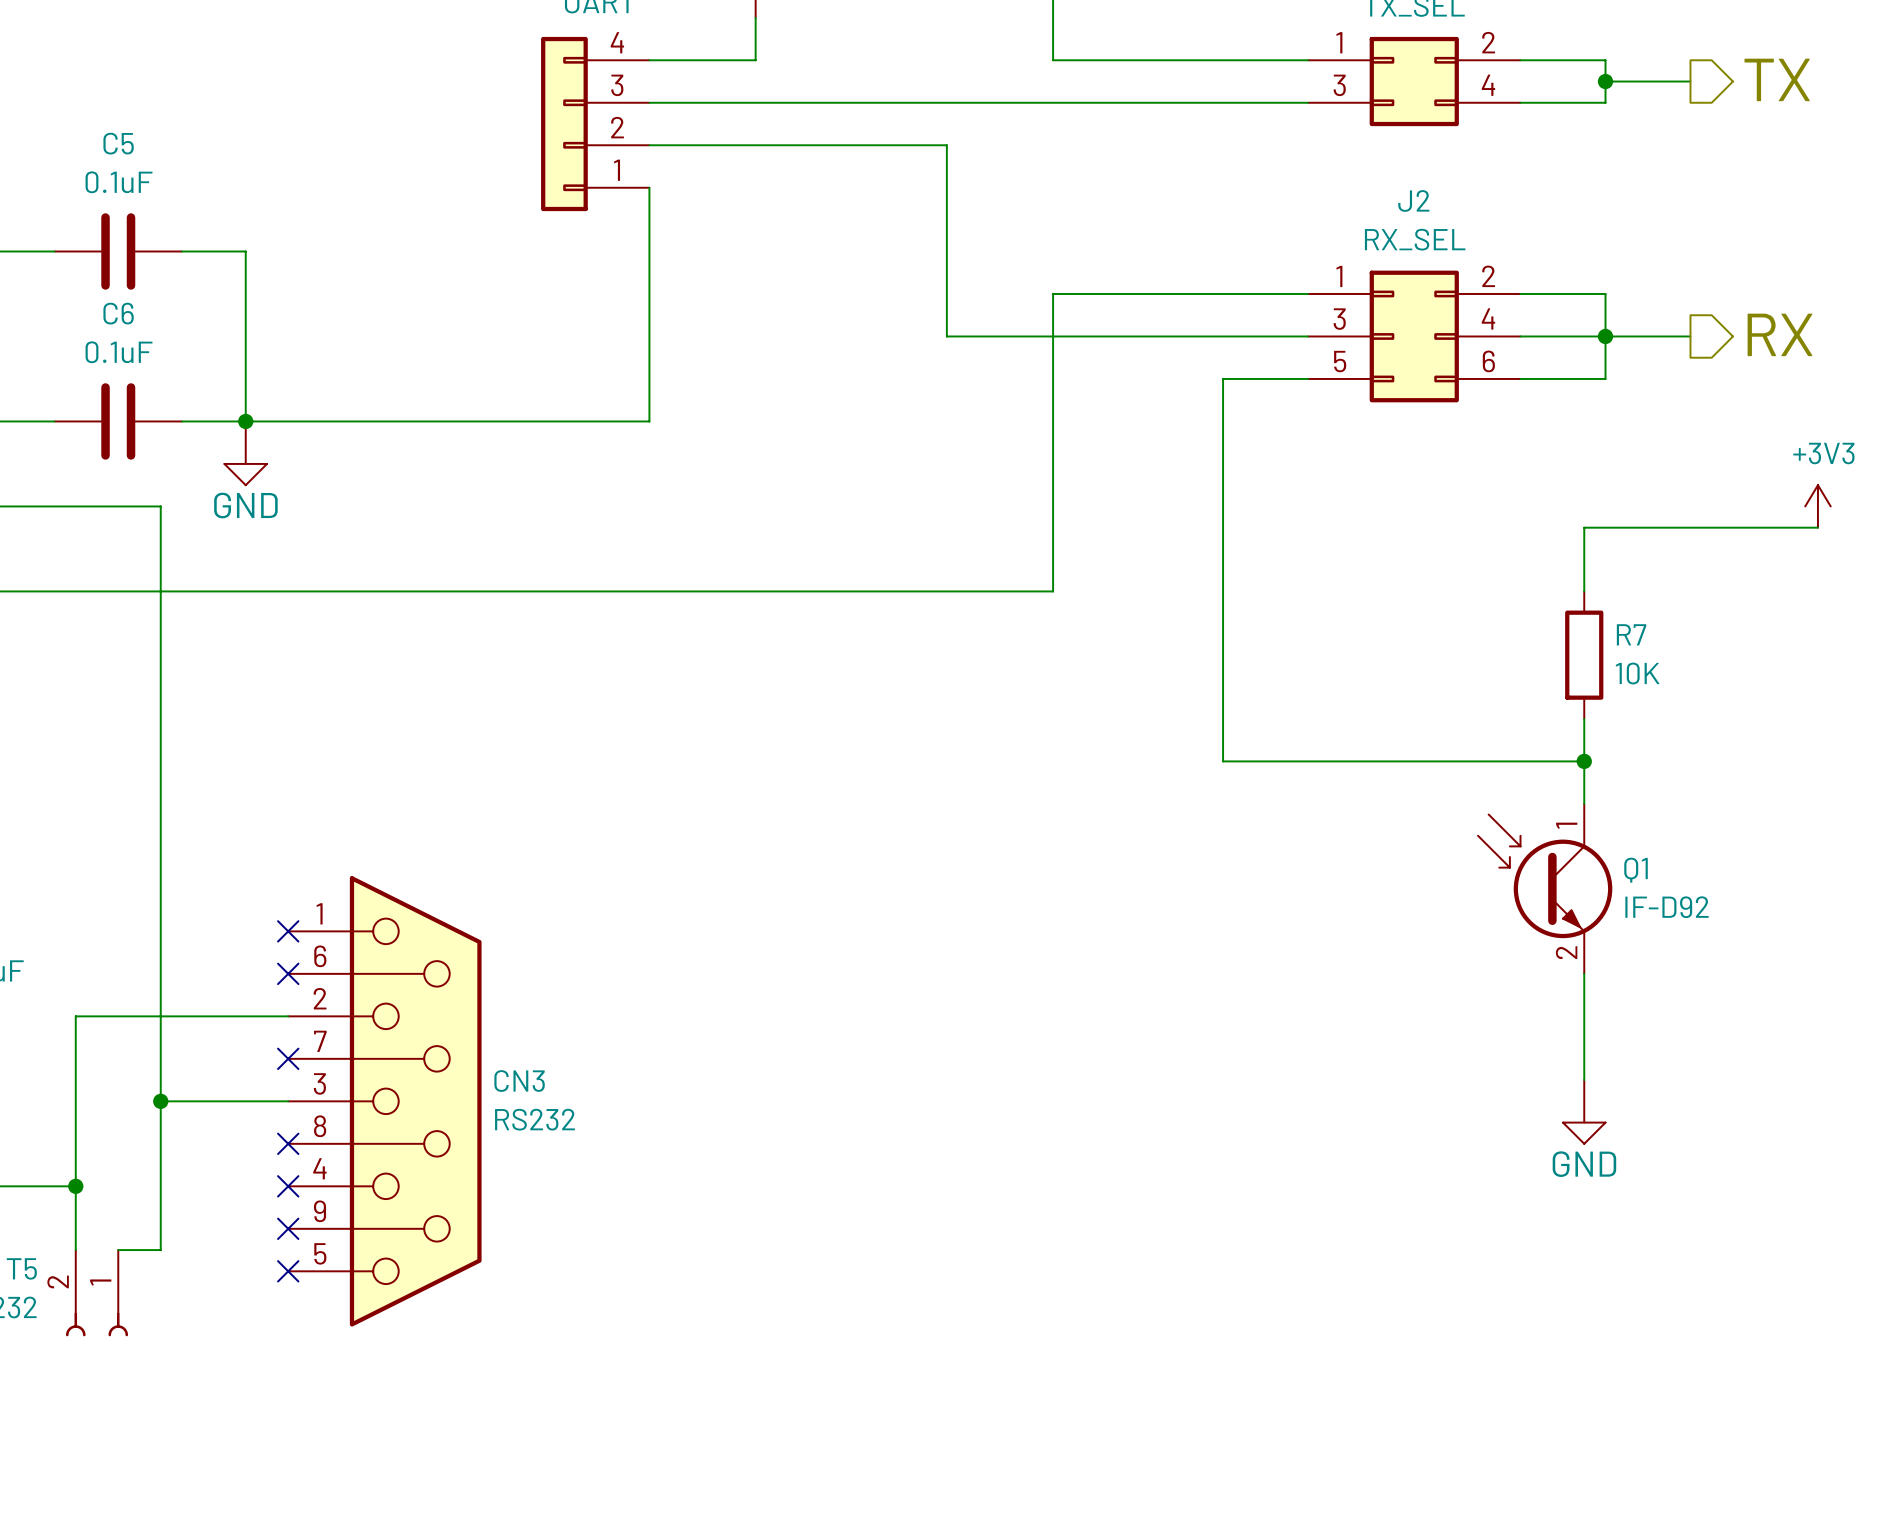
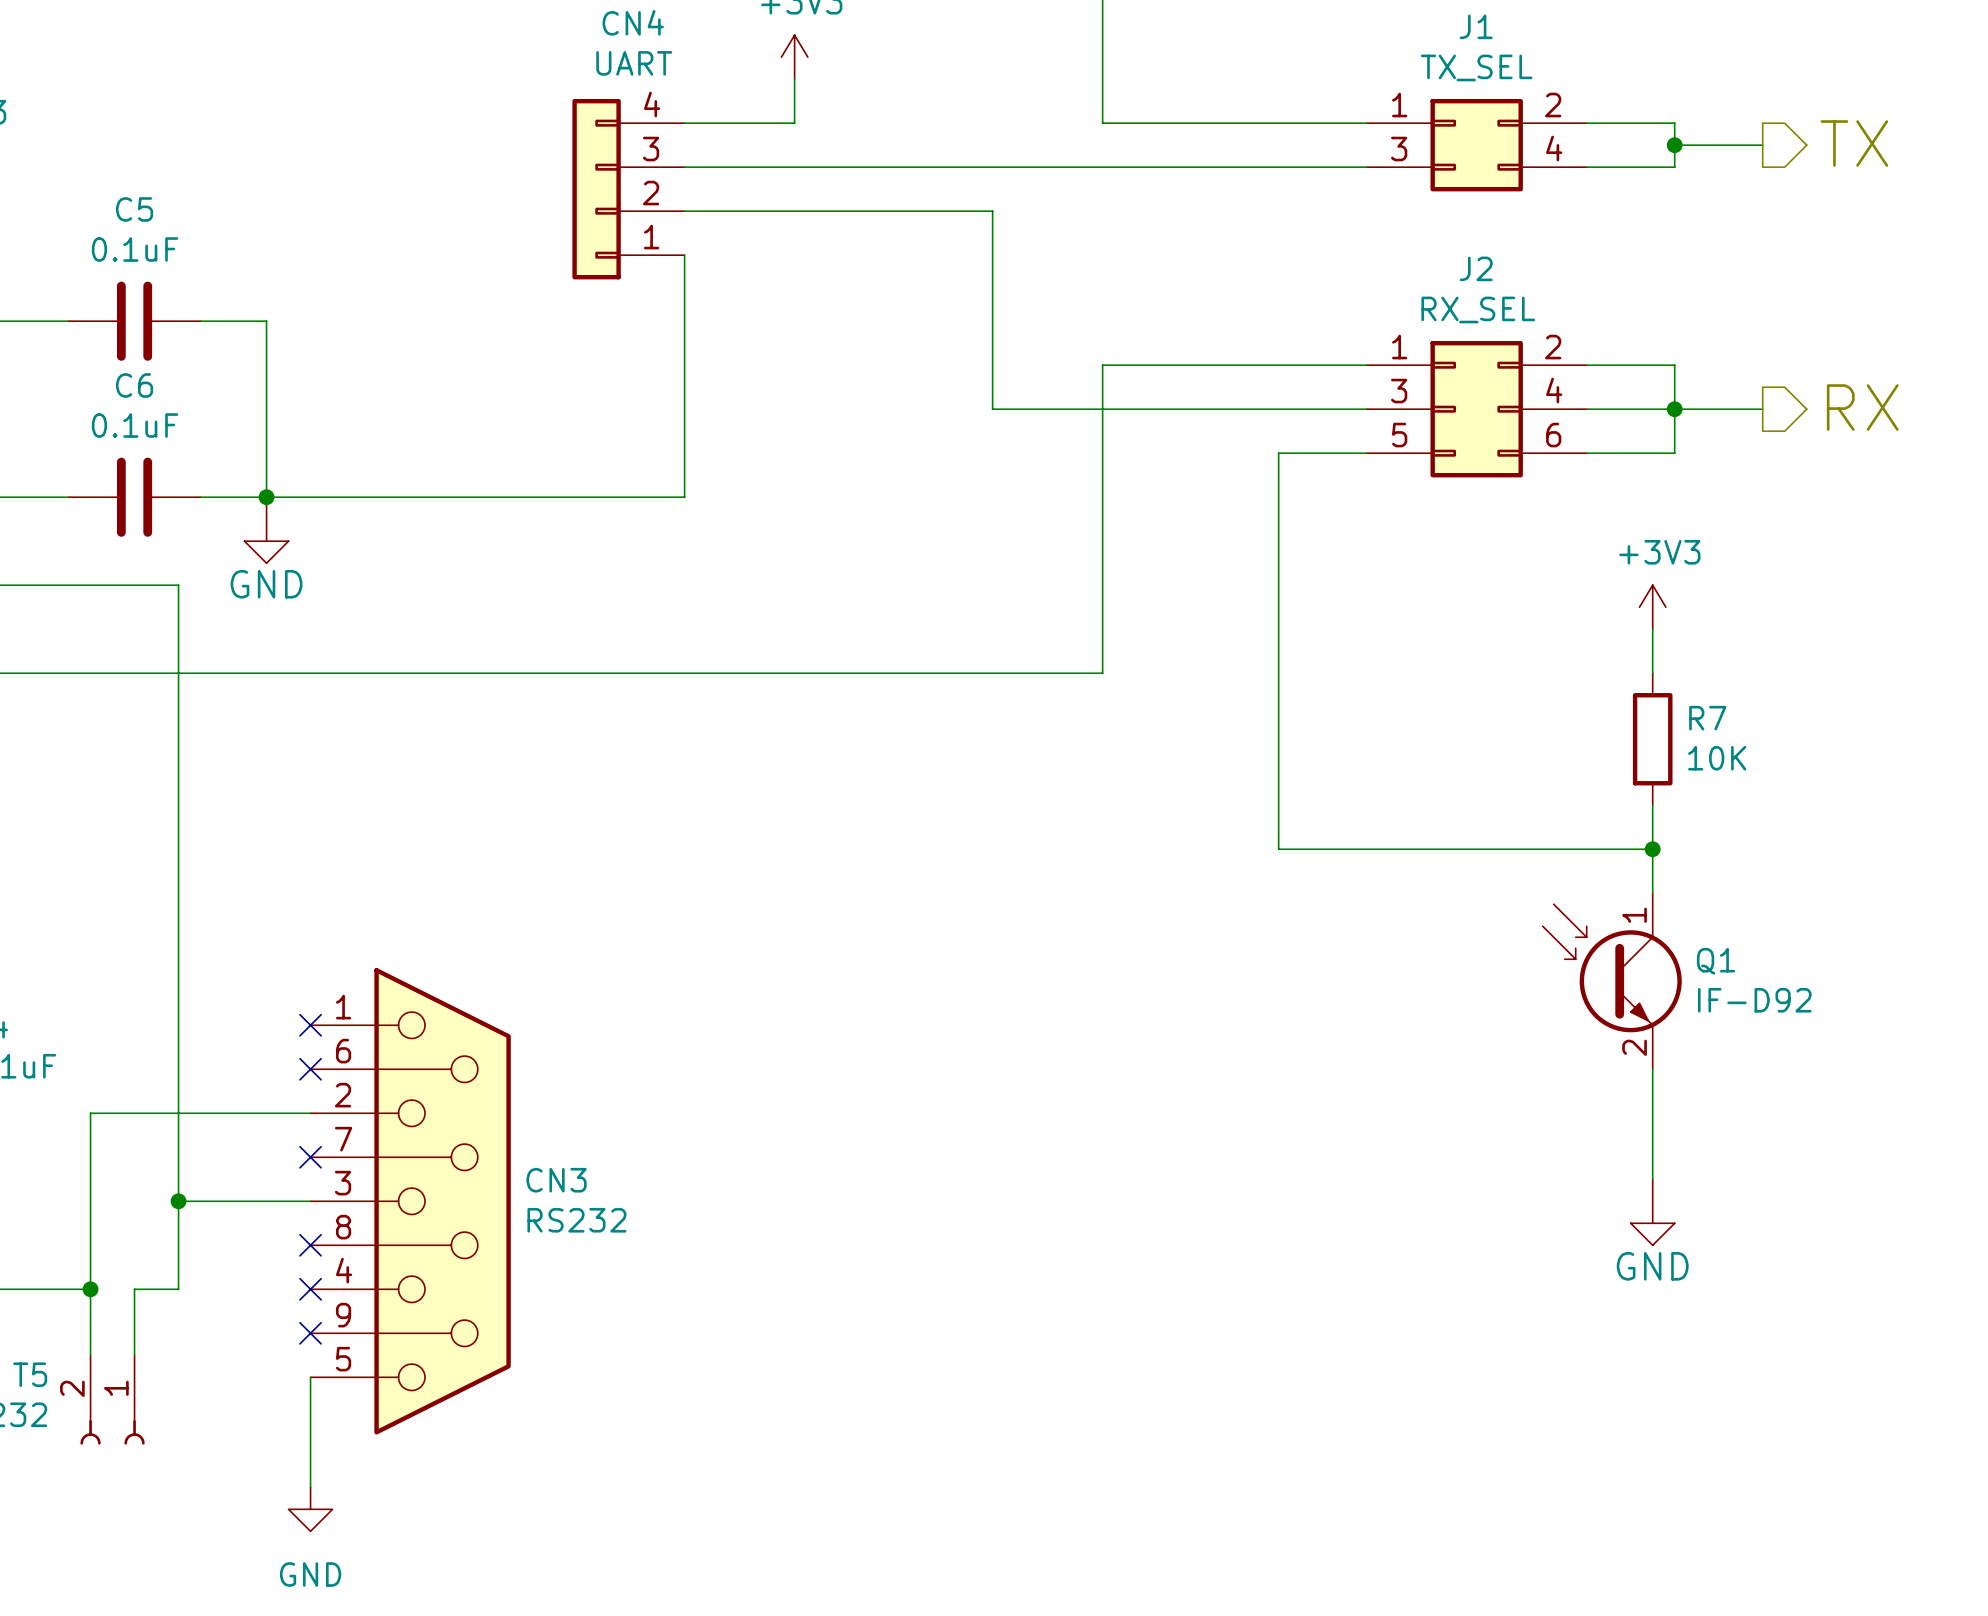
power symbol position: +3V3 (1817, 506) -> +3V3 (1652, 607)
wire: (1817, 527) (1584, 527) (1584, 548) -> none
wire: (160, 1186) (160, 1250) (118, 1250) -> (178, 1289) (134, 1289) (134, 1355)
wire: none -> (310, 1377) (310, 1487)
no-connect mark: (288, 1271) -> none
power symbol: none -> GND (310, 1509)

